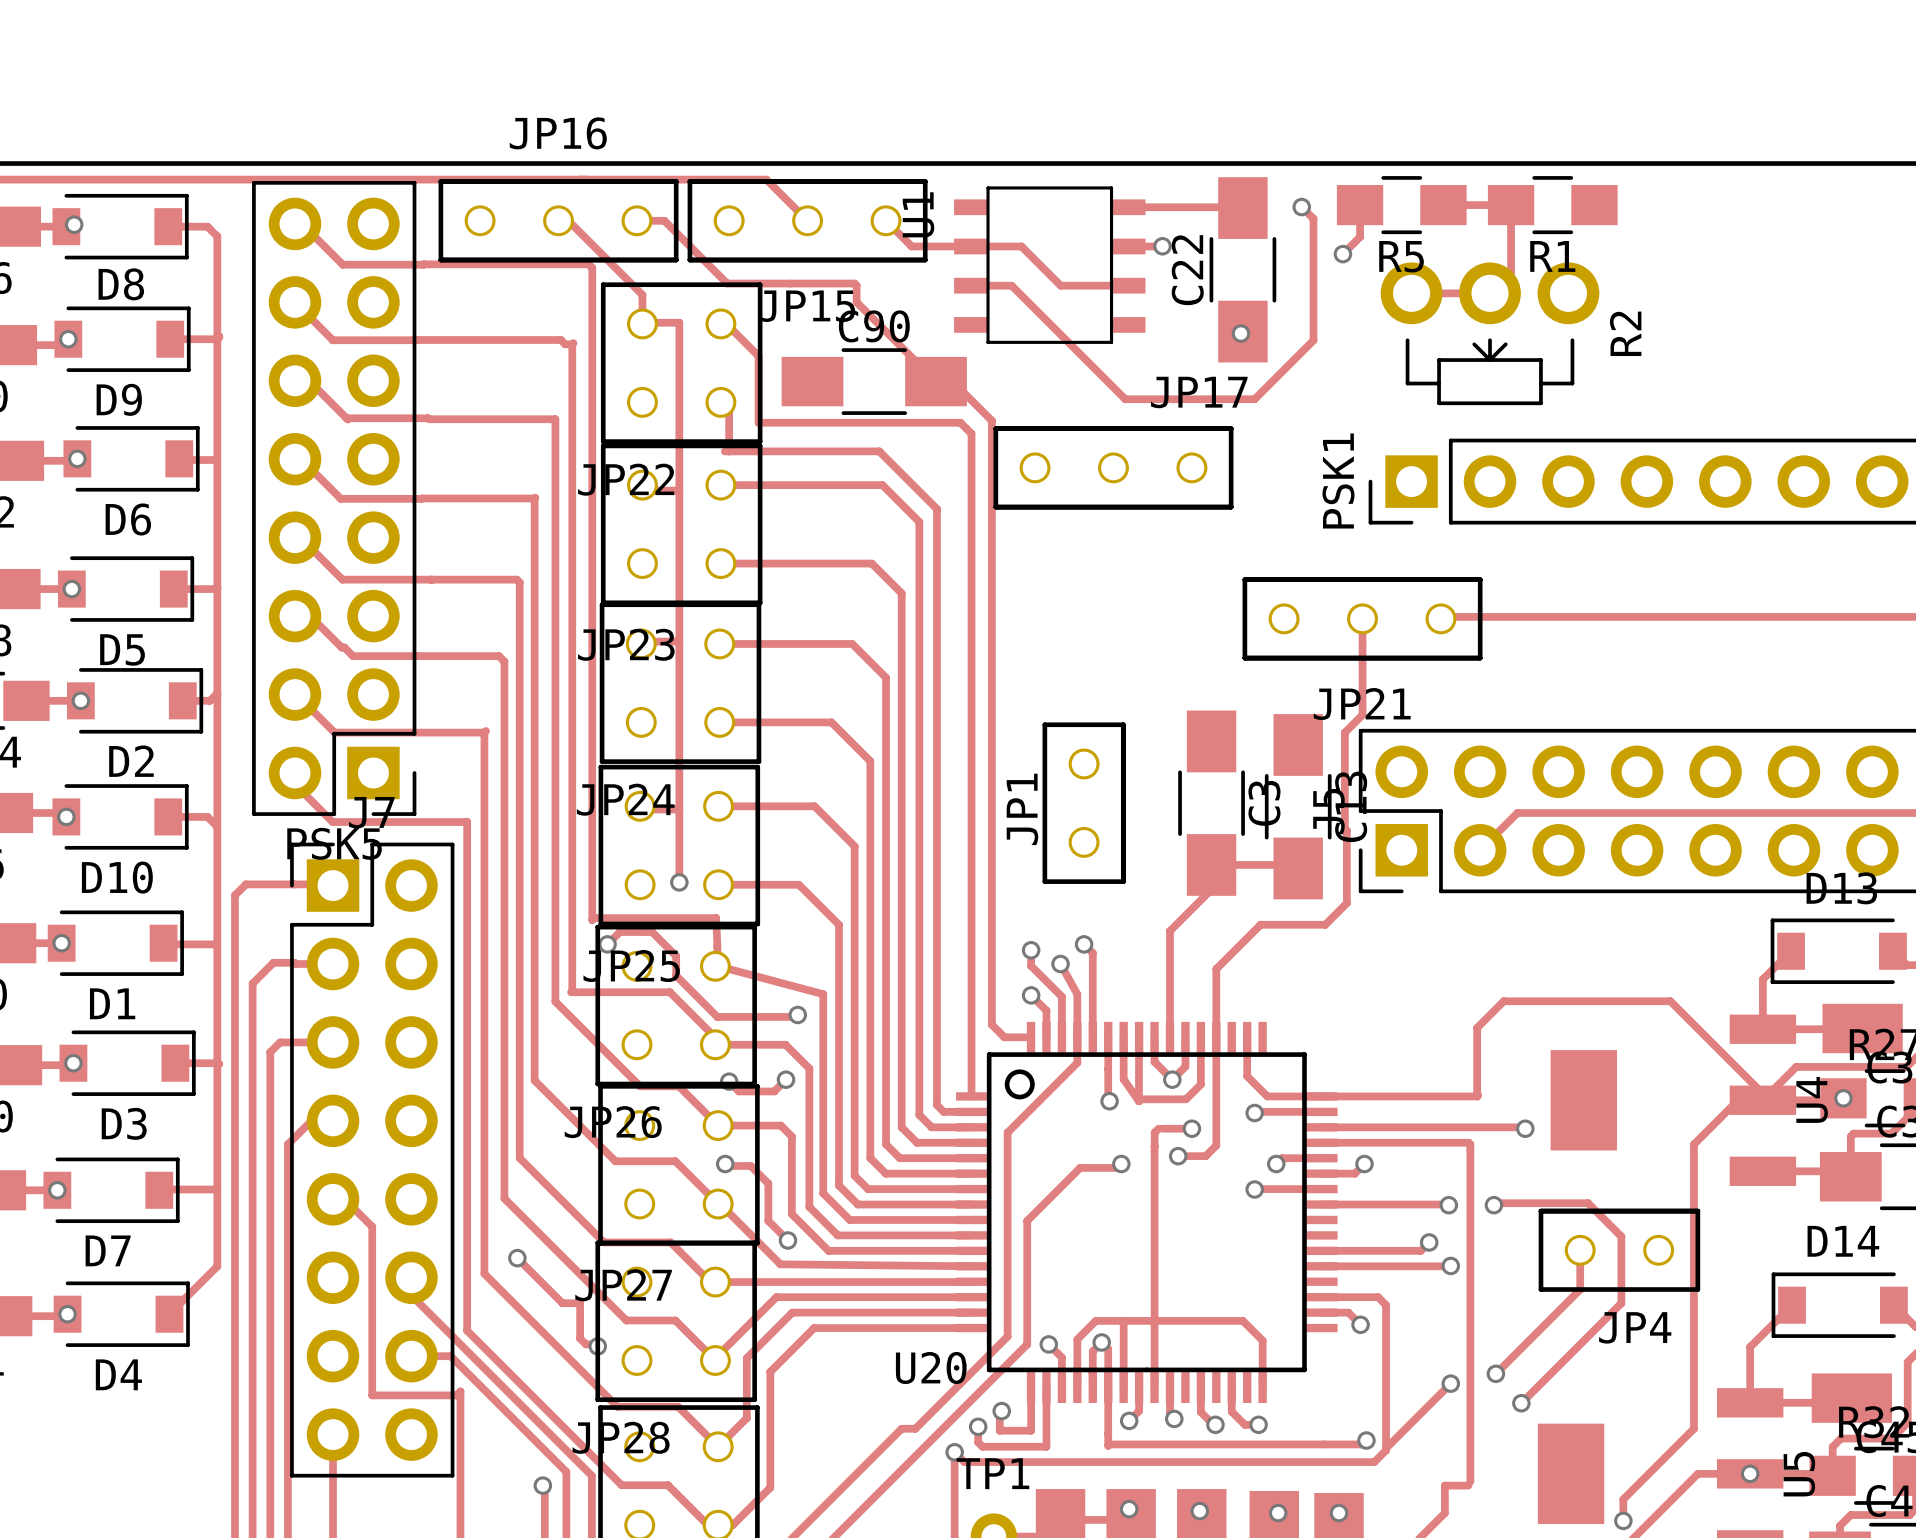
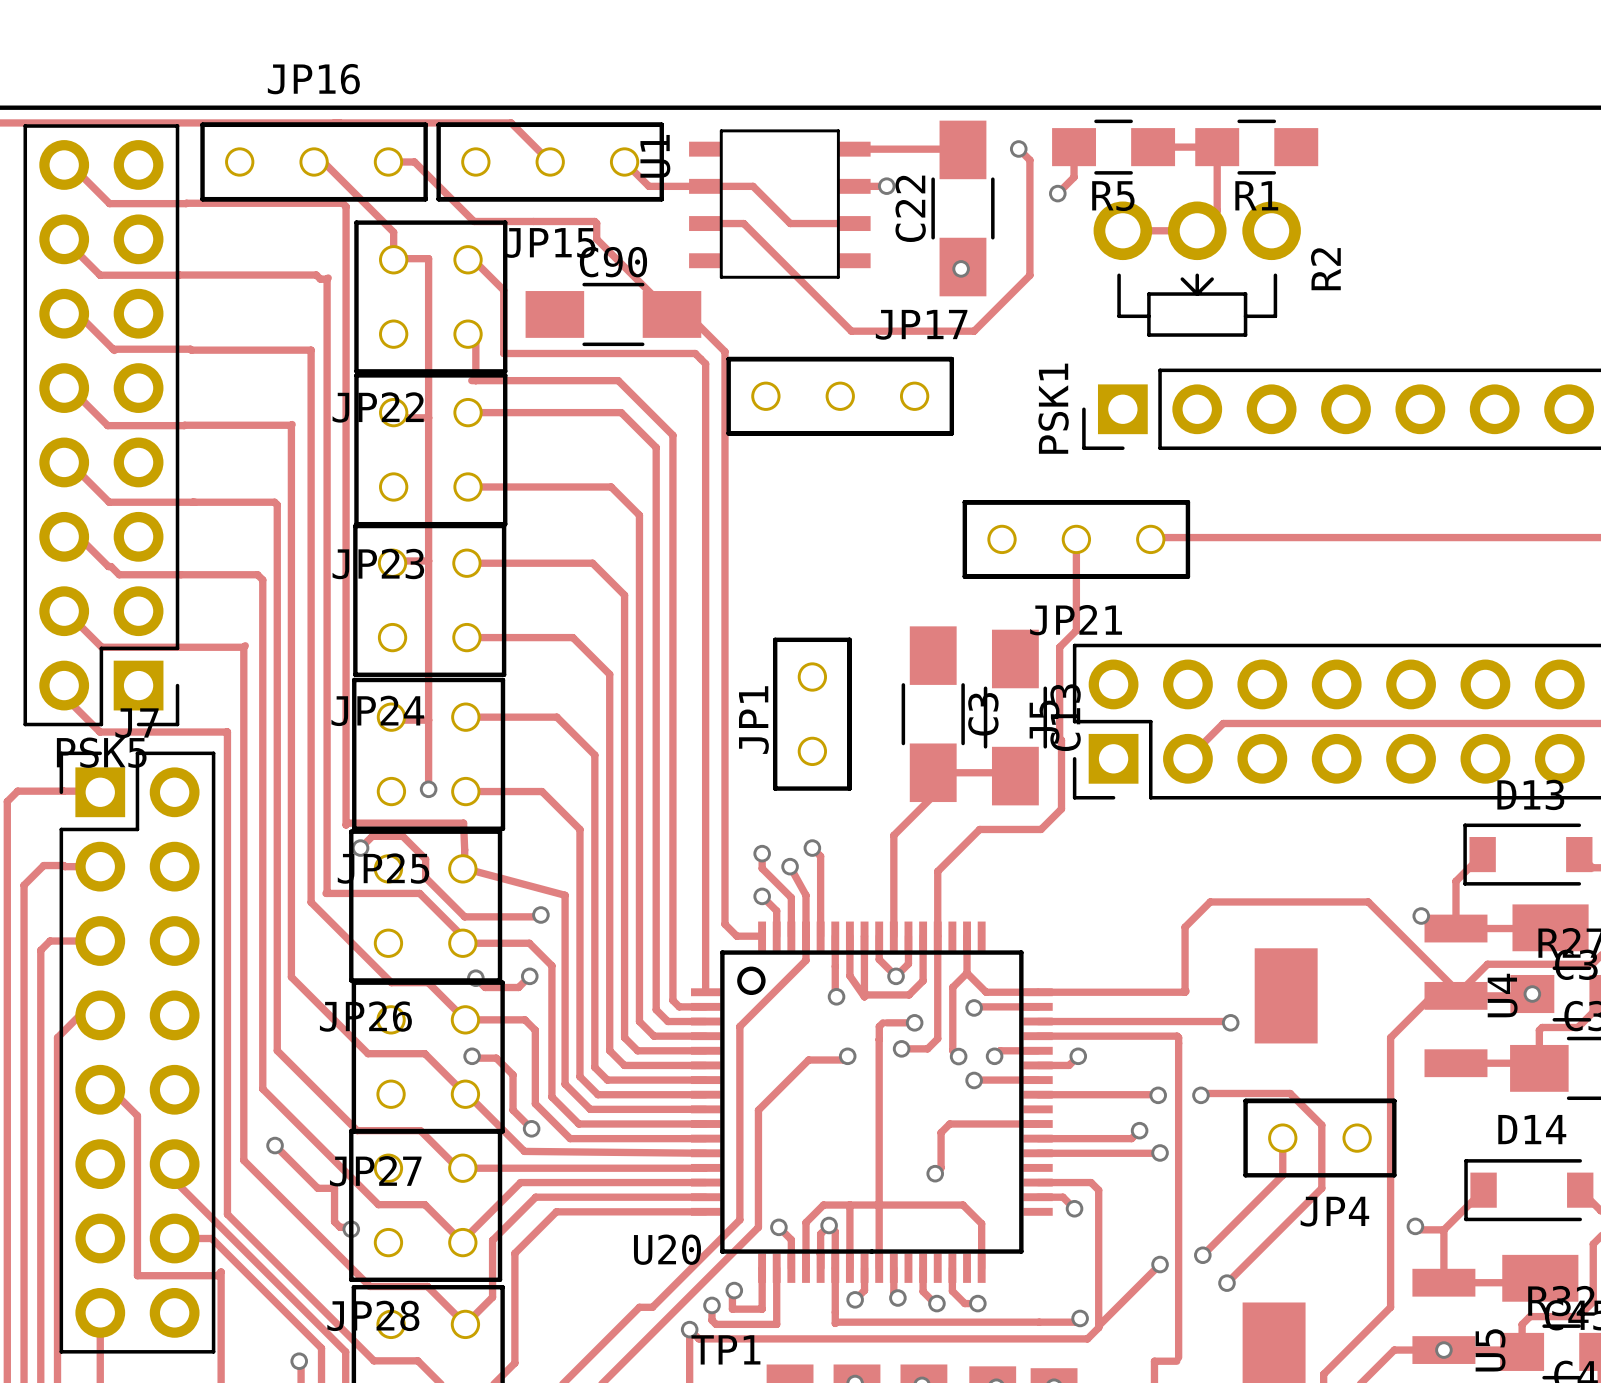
via: none -> (1421, 916)
track: none -> (967, 973) (952, 987) (952, 1050) (958, 1056)
via: none -> (958, 1056)
track: none -> (1038, 1123) (949, 1123) (941, 1132) (941, 1167) (935, 1173)
via: none -> (935, 1173)
track: none -> (1415, 1226) (1418, 1229) (1443, 1229)
via: none -> (1415, 1226)

